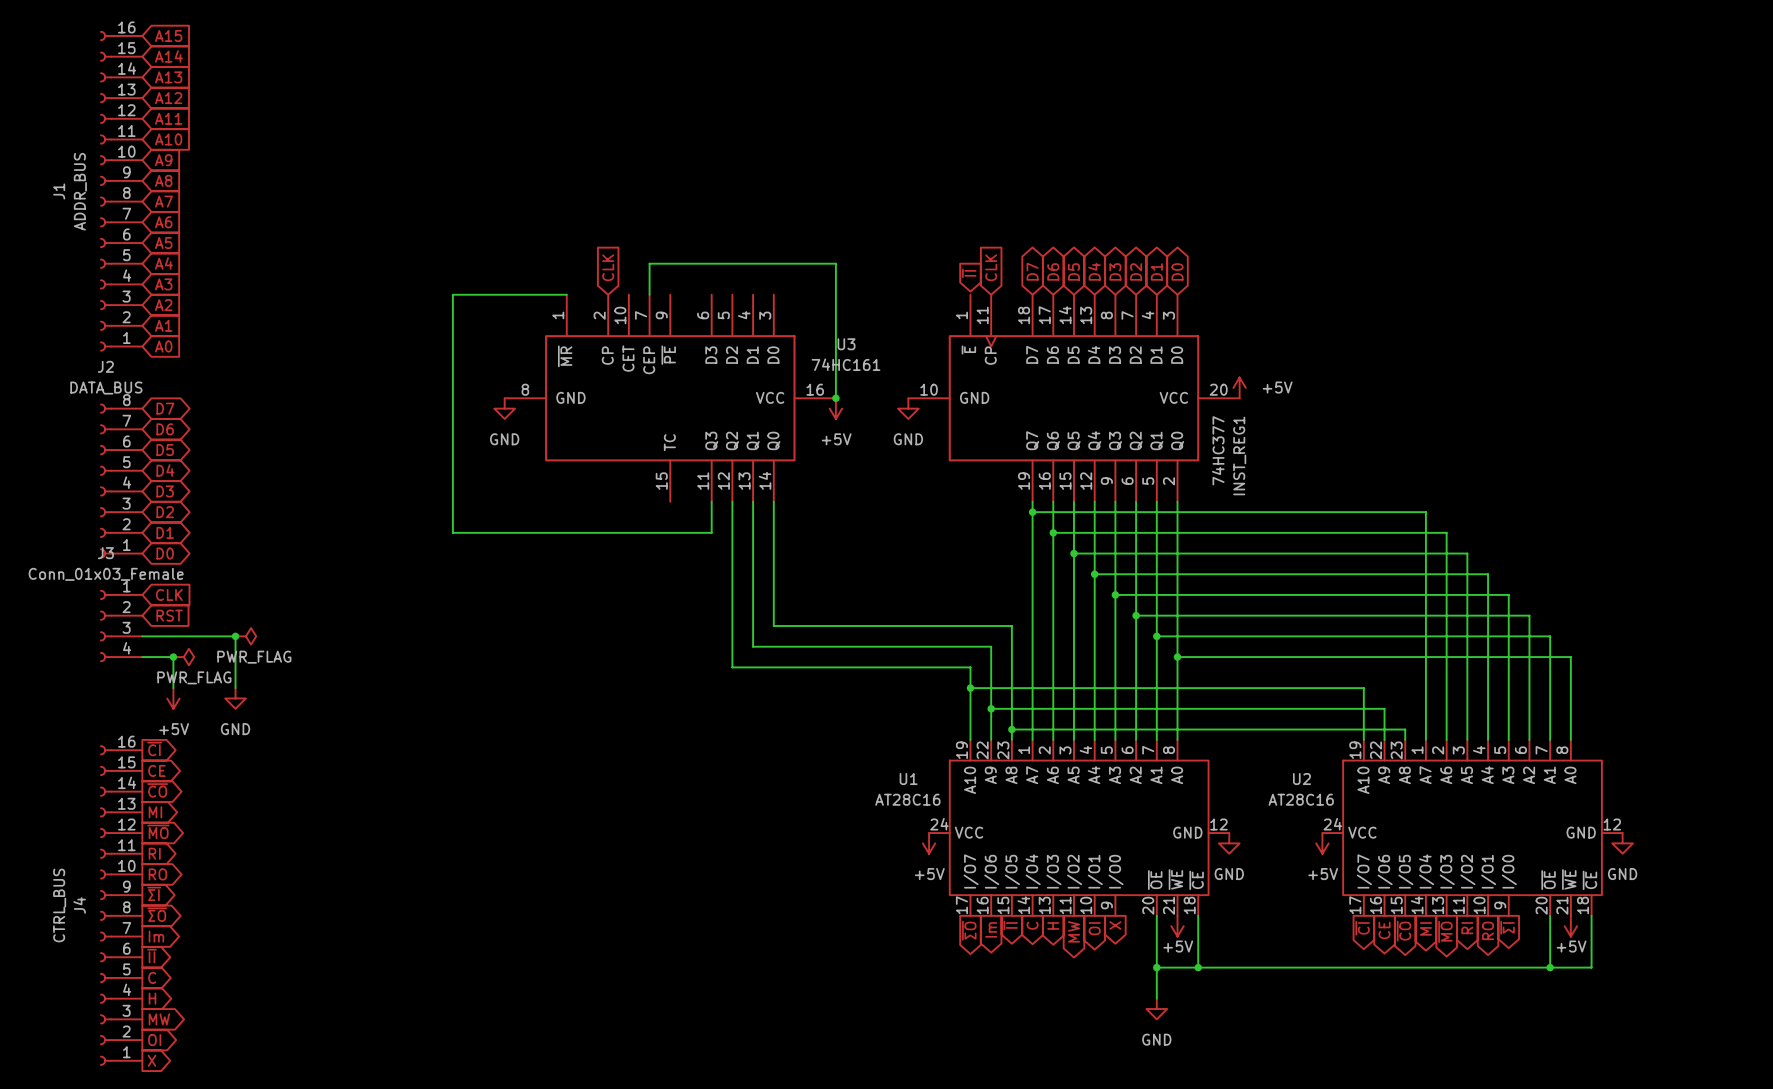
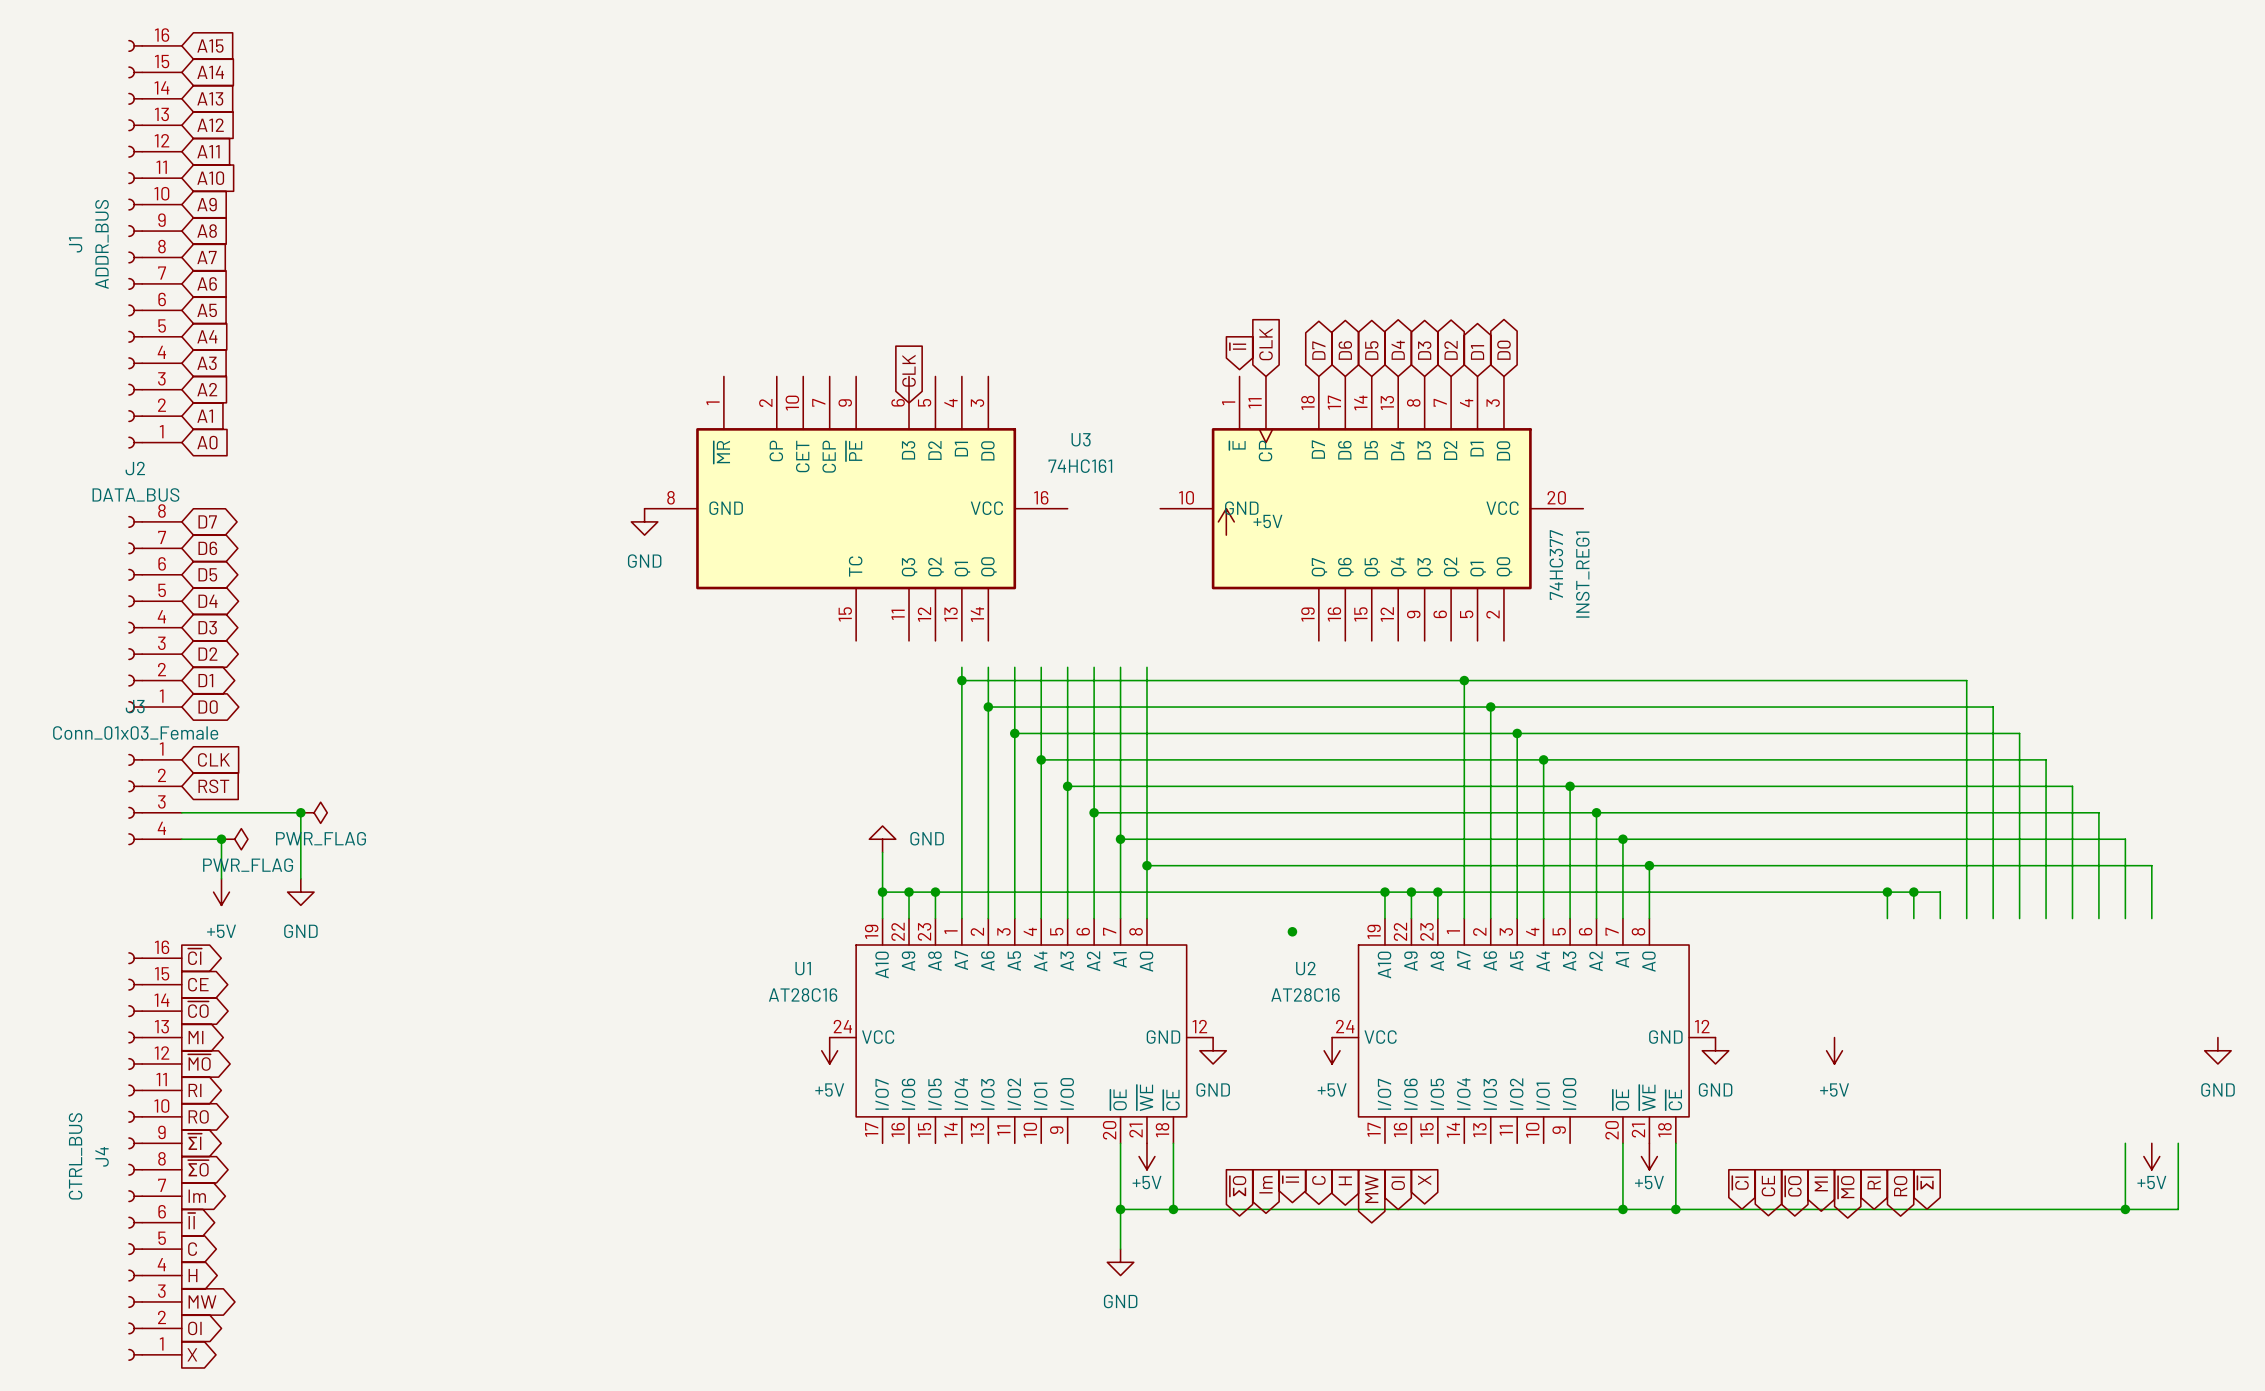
global label position: CLK (608, 267) -> CLK (909, 370)
wire: (566, 294) (452, 294) (452, 532) (711, 532) (711, 501) -> none
wire: (649, 294) (649, 263) (835, 263) (835, 398) -> none
power symbol: +5V (1239, 387) -> none
junction: (835, 398) -> none
power symbol rotation: 0° (835, 408) -> 180° (1226, 521)
power symbol position: +5V (835, 408) -> +5V (1226, 521)
power symbol: GND (908, 408) -> none
power symbol text position: +5V (836, 439) -> +5V (1267, 521)
wire: (732, 501) (732, 667) (970, 667) (970, 739) -> none
wire: (753, 501) (753, 522) -> (909, 892) (909, 918)
wire: (773, 501) (773, 522) -> (935, 892) (935, 918)
wire: (1032, 501) (1032, 739) -> none
wire: (1053, 501) (1053, 739) -> none
wire: (1073, 501) (1073, 739) -> none
wire: (1094, 501) (1094, 739) -> none
wire: (1115, 501) (1115, 739) -> none
wire: (1136, 501) (1136, 739) -> none
wire: (1156, 501) (1156, 739) -> none
wire: (1177, 501) (1177, 739) -> none
wire: (1032, 512) (1425, 512) (1425, 739) -> none
junction: (1032, 512) -> none
wire: none -> (1014, 667) (1014, 918)
wire: none -> (1041, 667) (1041, 918)
wire: none -> (1067, 667) (1067, 918)
wire: none -> (1094, 667) (1094, 918)
wire: none -> (1120, 667) (1120, 918)
wire: none -> (1146, 667) (1146, 918)
wire: none -> (961, 680) (1345, 680)
junction: none -> (961, 680)
junction: (1053, 532) -> none
wire: none -> (1464, 680) (1464, 918)
junction: none -> (1464, 680)
wire: (1446, 532) (1446, 739) -> (1847, 680) (1966, 680) (1966, 918)
wire: none -> (988, 707) (1371, 707)
junction: none -> (988, 707)
junction: (1073, 553) -> none
wire: none -> (1490, 707) (1490, 918)
junction: none -> (1490, 707)
wire: (1467, 553) (1467, 739) -> (1874, 707) (1993, 707) (1993, 918)
wire: none -> (1014, 733) (1398, 733)
junction: none -> (1014, 733)
junction: (1094, 574) -> none
wire: none -> (1517, 733) (1517, 918)
junction: none -> (1517, 733)
wire: (1488, 574) (1488, 739) -> (1900, 733) (2019, 733) (2019, 918)
wire: none -> (1041, 759) (1424, 759)
junction: none -> (1041, 759)
junction: (1115, 594) -> none
wire: none -> (1543, 759) (1543, 918)
junction: none -> (1543, 759)
wire: (1508, 594) (1508, 739) -> (1927, 759) (2046, 759) (2046, 918)
wire: none -> (1067, 786) (1451, 786)
junction: none -> (1067, 786)
junction: (1136, 615) -> none
wire: none -> (1570, 786) (1570, 918)
junction: none -> (1570, 786)
wire: (1529, 615) (1529, 739) -> (1953, 786) (2072, 786) (2072, 918)
wire: (773, 626) (1011, 626) (1011, 739) -> (988, 799) (988, 918)
wire: none -> (1094, 812) (1477, 812)
junction: none -> (1094, 812)
junction: (1156, 636) -> none
wire: none -> (1596, 812) (1596, 918)
junction: none -> (1596, 812)
wire: (1550, 636) (1550, 739) -> (1979, 812) (2098, 812) (2098, 918)
wire: (753, 646) (991, 646) (991, 739) -> (961, 826) (961, 918)
power symbol: none -> GND (882, 839)
wire: none -> (1120, 839) (1503, 839)
junction: none -> (1120, 839)
junction: (1177, 657) -> none
wire: none -> (1622, 839) (1622, 918)
junction: none -> (1622, 839)
wire: (1570, 657) (1570, 739) -> (2006, 839) (2125, 839) (2125, 918)
wire: none -> (882, 852) (882, 918)
wire: none -> (1146, 865) (2151, 865) (2151, 918)
junction: none -> (1146, 865)
wire: none -> (1649, 865) (1649, 918)
junction: none -> (1649, 865)
wire: (970, 688) (1363, 688) (1363, 739) -> none
junction: (970, 688) -> none
wire: none -> (882, 892) (1940, 892) (1940, 918)
junction: none -> (882, 892)
junction: none -> (909, 892)
junction: none -> (935, 892)
wire: none -> (1384, 892) (1384, 918)
junction: none -> (1384, 892)
wire: none -> (1411, 892) (1411, 918)
junction: none -> (1411, 892)
wire: none -> (1437, 892) (1437, 918)
junction: none -> (1437, 892)
wire: none -> (1887, 892) (1887, 918)
junction: none -> (1887, 892)
wire: none -> (1913, 892) (1913, 918)
junction: none -> (1913, 892)
wire: (991, 708) (1384, 708) (1384, 739) -> none
junction: (991, 708) -> none
wire: (1011, 729) (1405, 729) (1405, 739) -> none
power symbol: none -> +5V (829, 1050)
power symbol: none -> GND (1213, 1050)
power symbol: none -> +5V (1332, 1050)
power symbol: none -> +5V (1834, 1050)
U1 position: (1079, 827) -> (1021, 1030)
U2 position: (1472, 827) -> (1523, 1030)
power symbol: +5V (929, 843) -> none
power symbol position: GND (1229, 843) -> GND (1715, 1050)
power symbol: +5V (1322, 843) -> none
power symbol position: GND (1622, 843) -> GND (2217, 1050)
wire: none -> (1120, 1143) (1120, 1249)
wire: none -> (1173, 1143) (1173, 1209)
wire: none -> (1622, 1143) (1622, 1209)
wire: none -> (2178, 1143) (2178, 1209) (1120, 1209)
power symbol: none -> +5V (1146, 1156)
power symbol: none -> +5V (1649, 1156)
power symbol: none -> +5V (2151, 1156)
wire: (1156, 915) (1156, 998) -> none
wire: (1198, 915) (1198, 967) -> (1675, 1143) (1675, 1209)
wire: (1550, 915) (1550, 967) -> (2125, 1143) (2125, 1209)
wire: (1591, 915) (1591, 967) (1156, 967) -> none
power symbol: +5V (1177, 926) -> none
power symbol: +5V (1570, 926) -> none
junction: none -> (1120, 1209)
junction: none -> (1173, 1209)
junction: none -> (1622, 1209)
junction: none -> (1675, 1209)
junction: none -> (2125, 1209)
junction: (1156, 967) -> none
junction: (1198, 967) -> none
junction: (1550, 967) -> none
power symbol: none -> GND (1120, 1262)
power symbol: GND (1156, 1009) -> none

